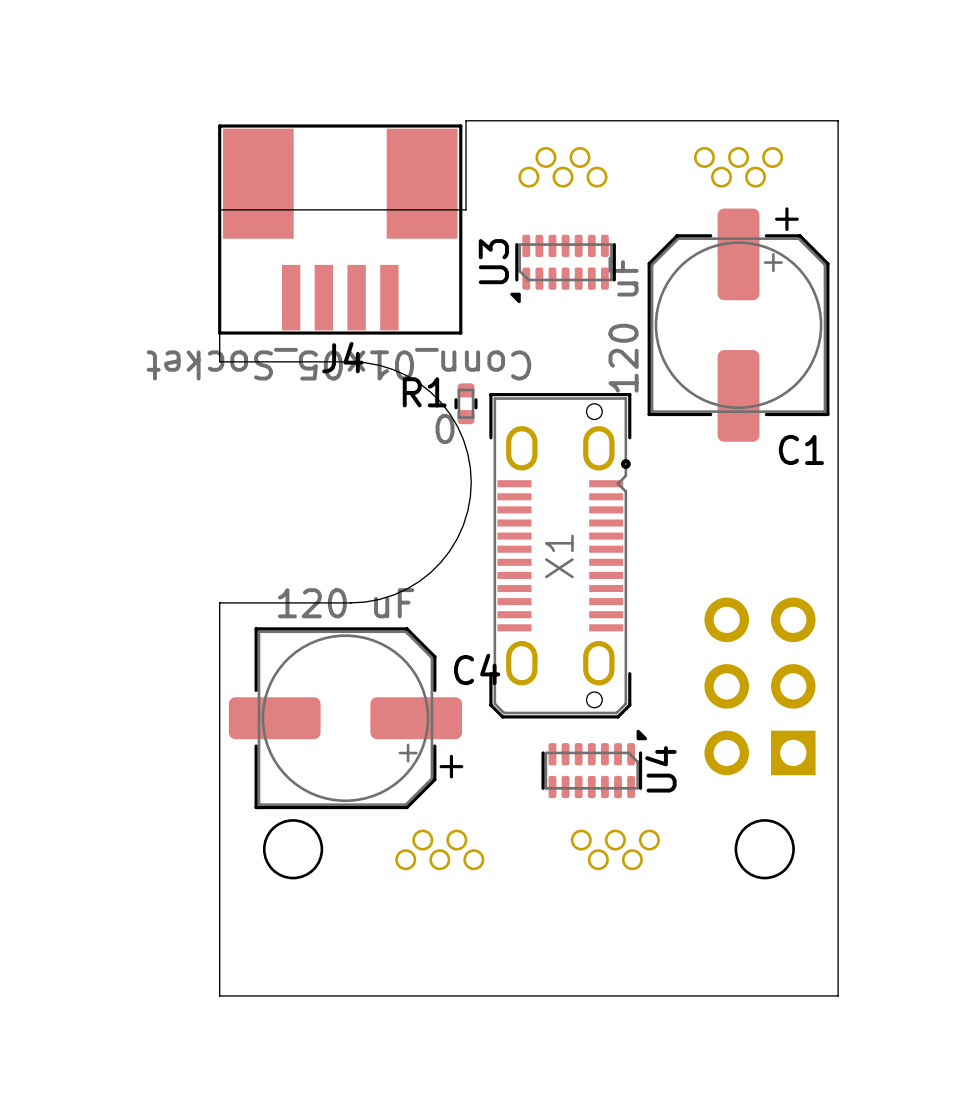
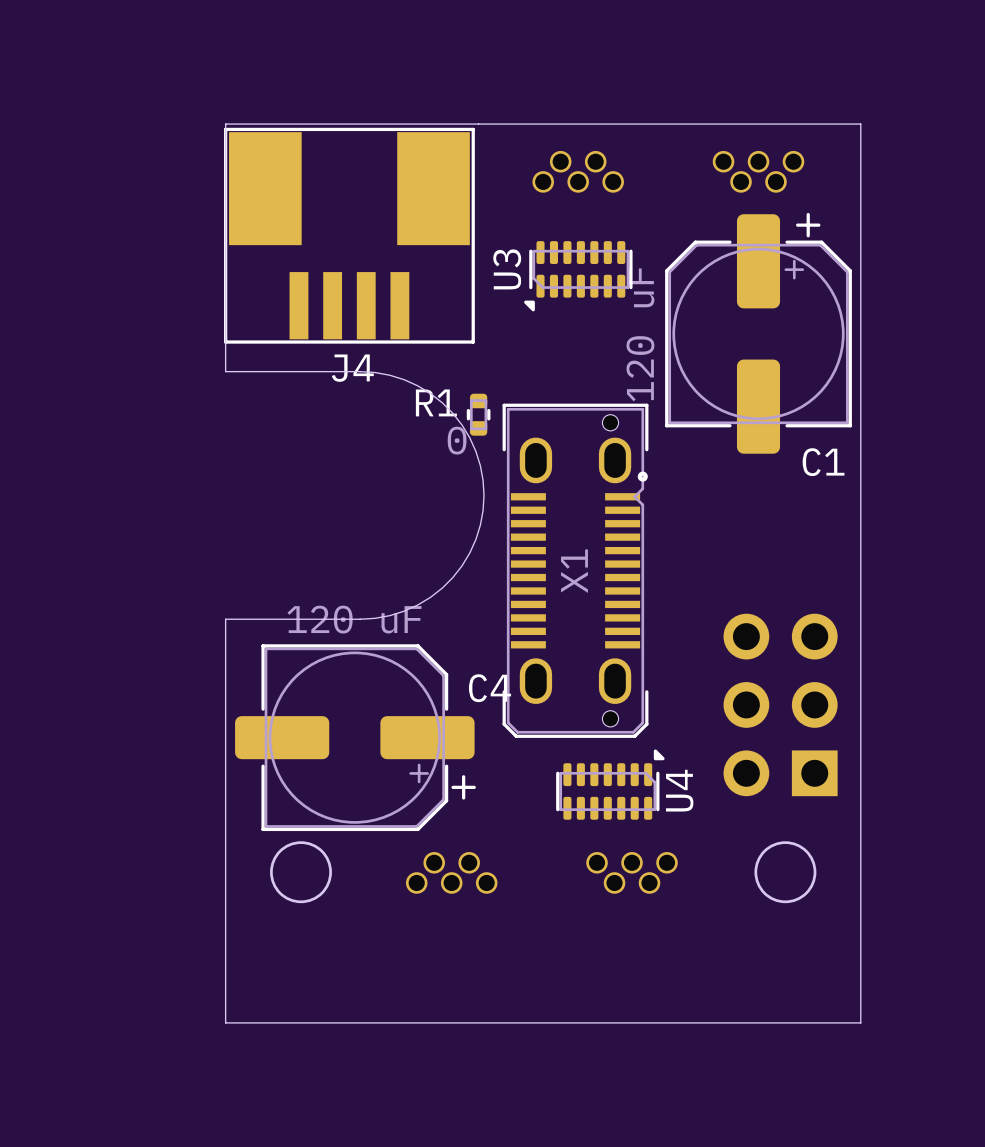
board edge: (466, 120) (466, 209) (219, 209) -> (478, 124) (225, 124) (225, 215)
J4 value: Conn_01x05_Socket (338, 364) -> none

